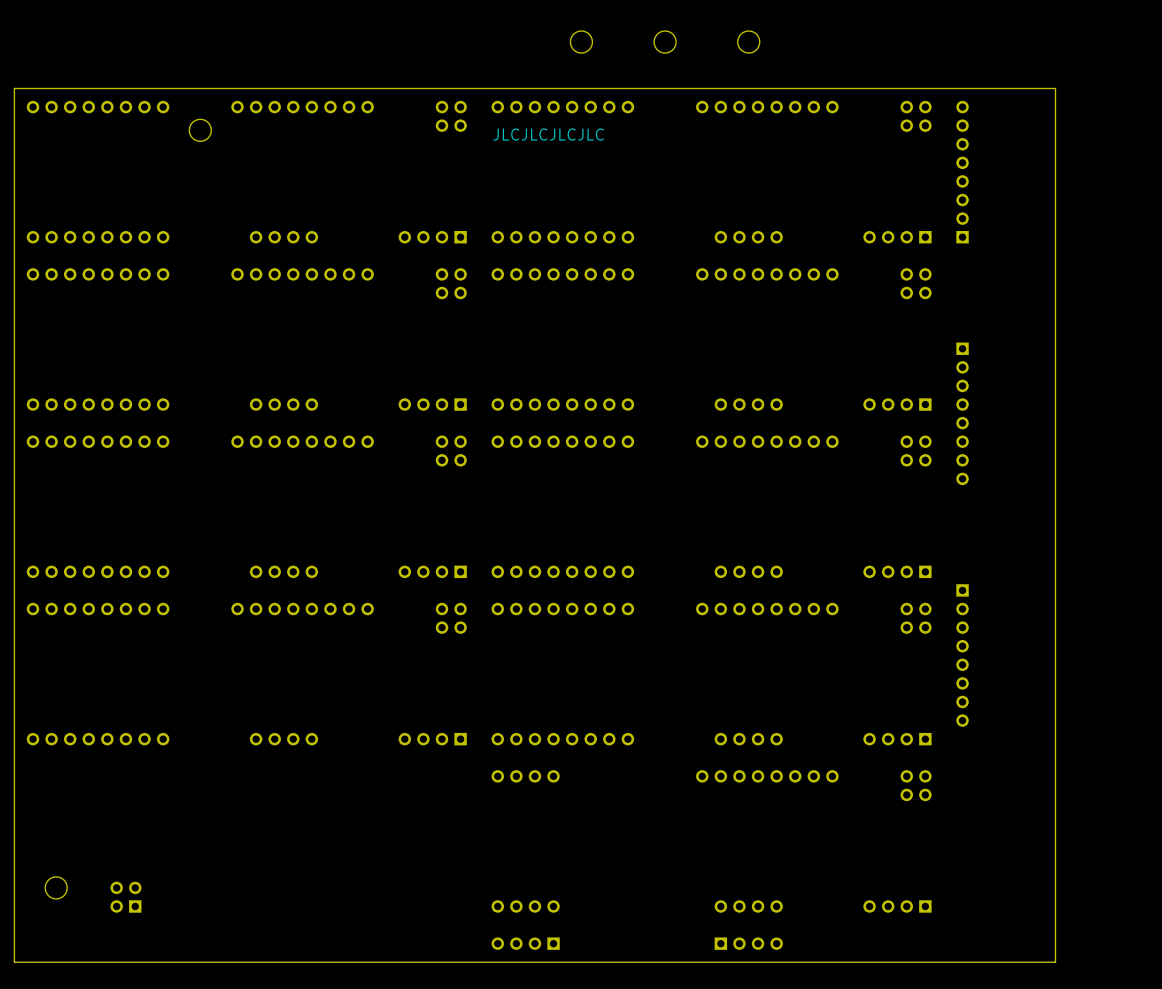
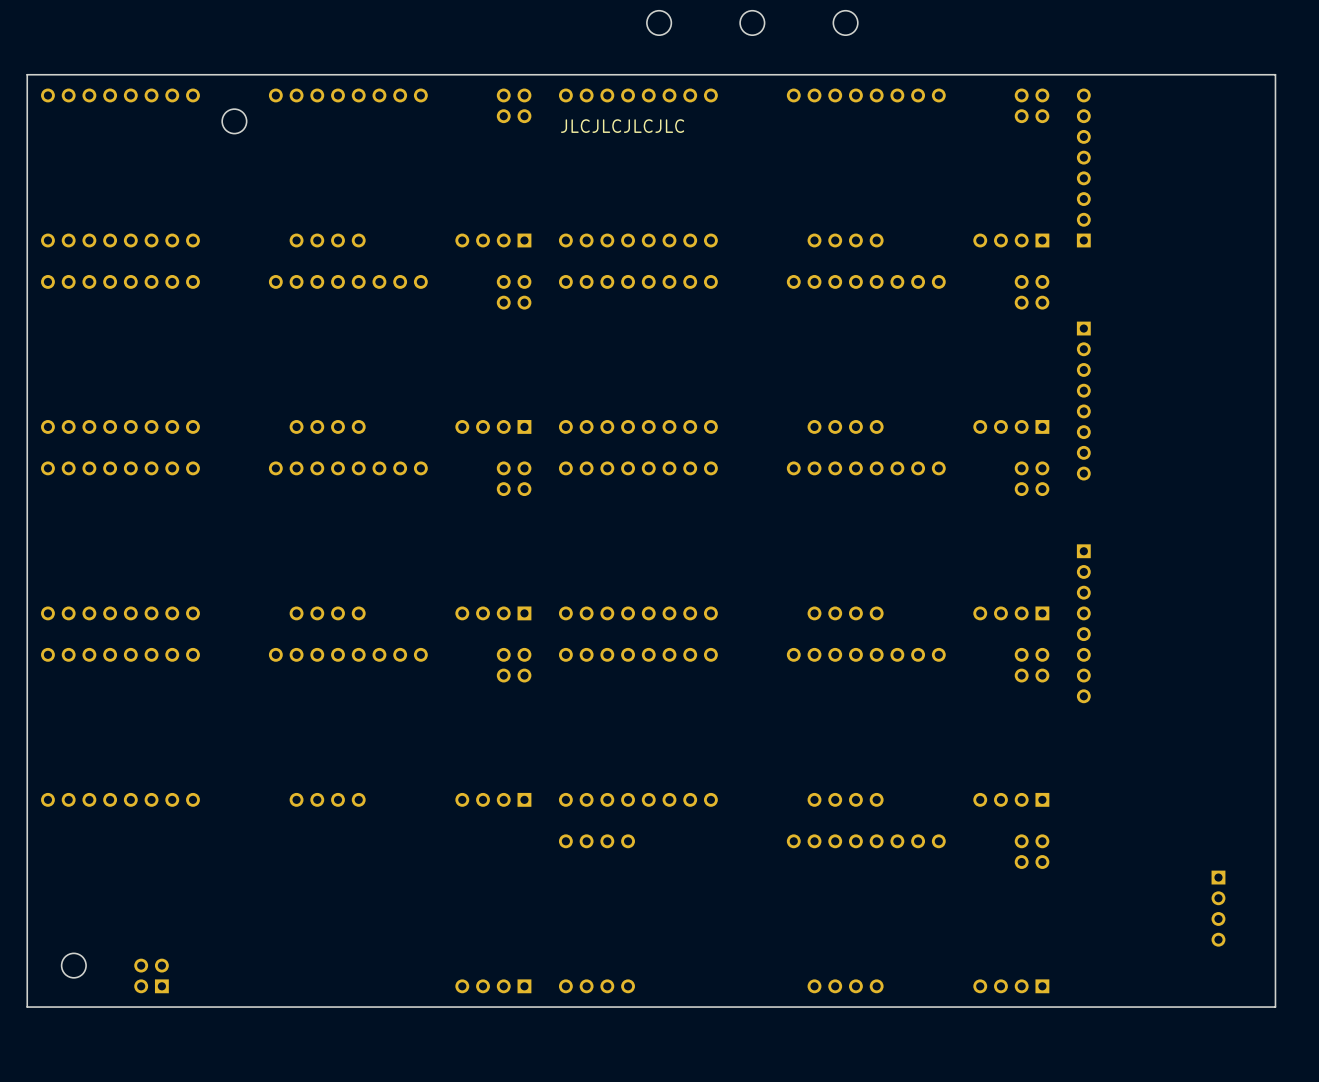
board edge: (1055, 88) (1055, 962) (14, 962) (14, 925) -> (1187, 74) (1275, 74) (1275, 1007) (27, 1007)
part position: (962, 413) -> (1083, 401)
part position: (962, 655) -> (1083, 623)
part: none -> (1218, 908)
part position: (525, 943) -> (493, 986)
part: (748, 943) -> none

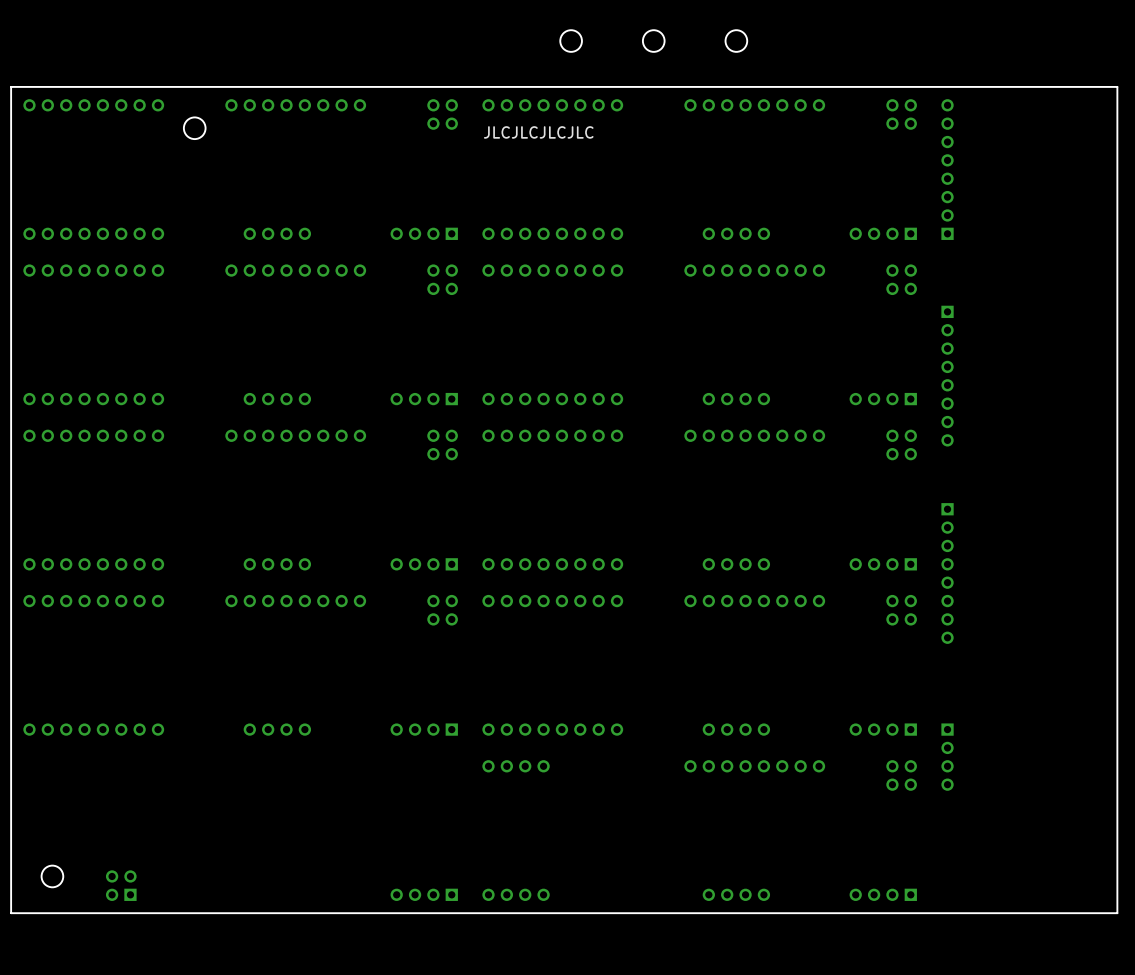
part position: (1218, 908) -> (947, 757)

